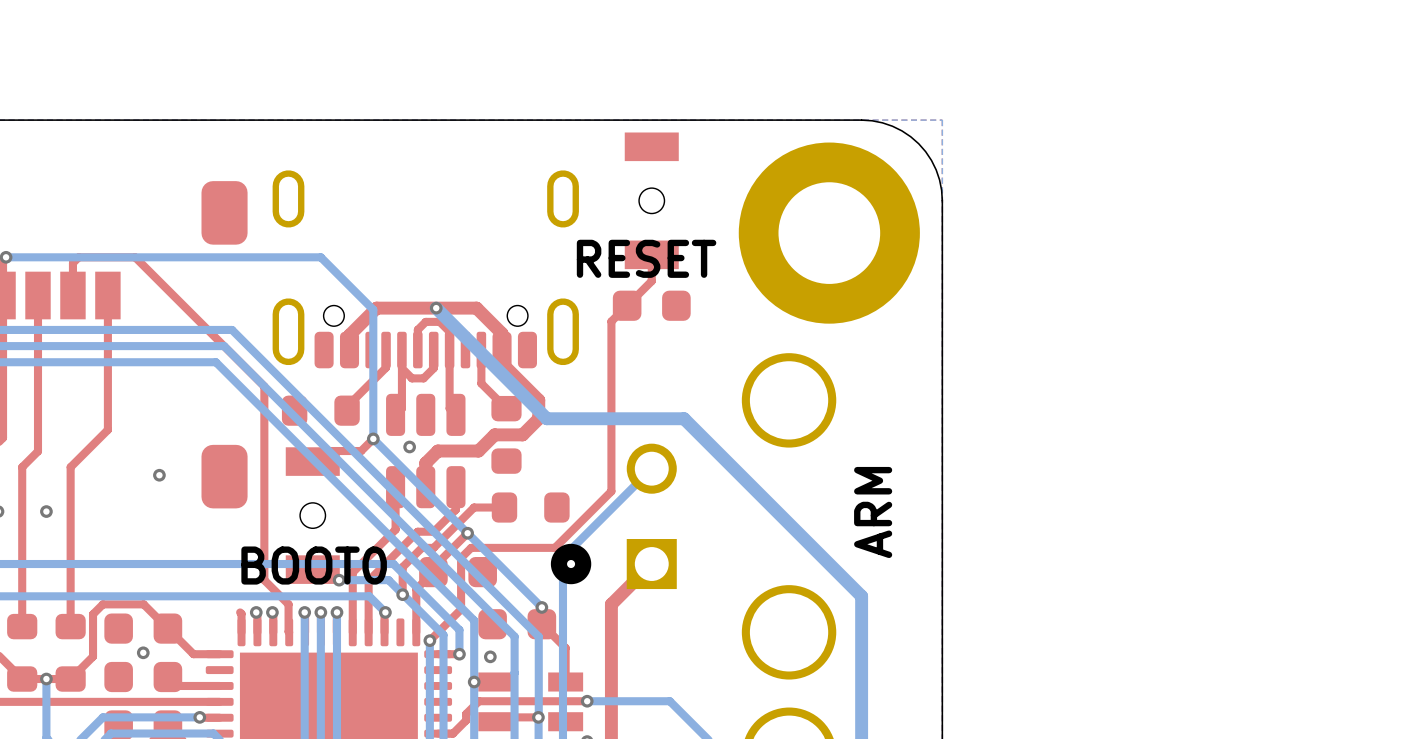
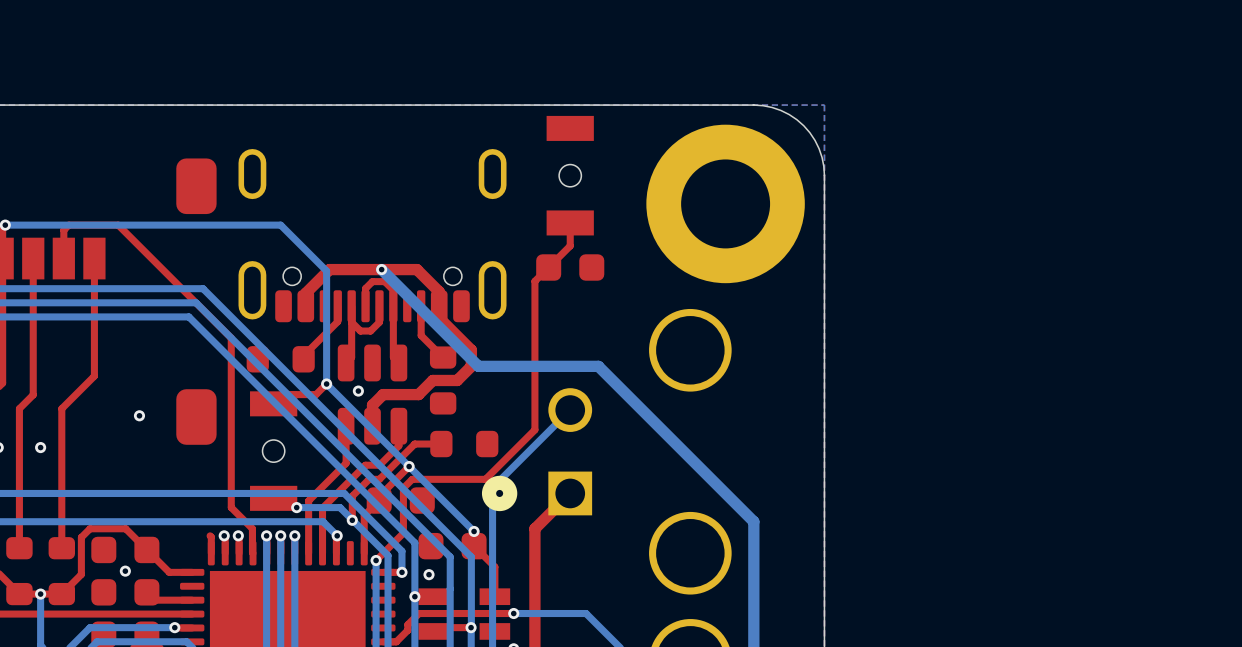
text: RESET (646, 258) -> none
text: ARM (873, 512) -> none
text: BOOT0 (314, 565) -> none

